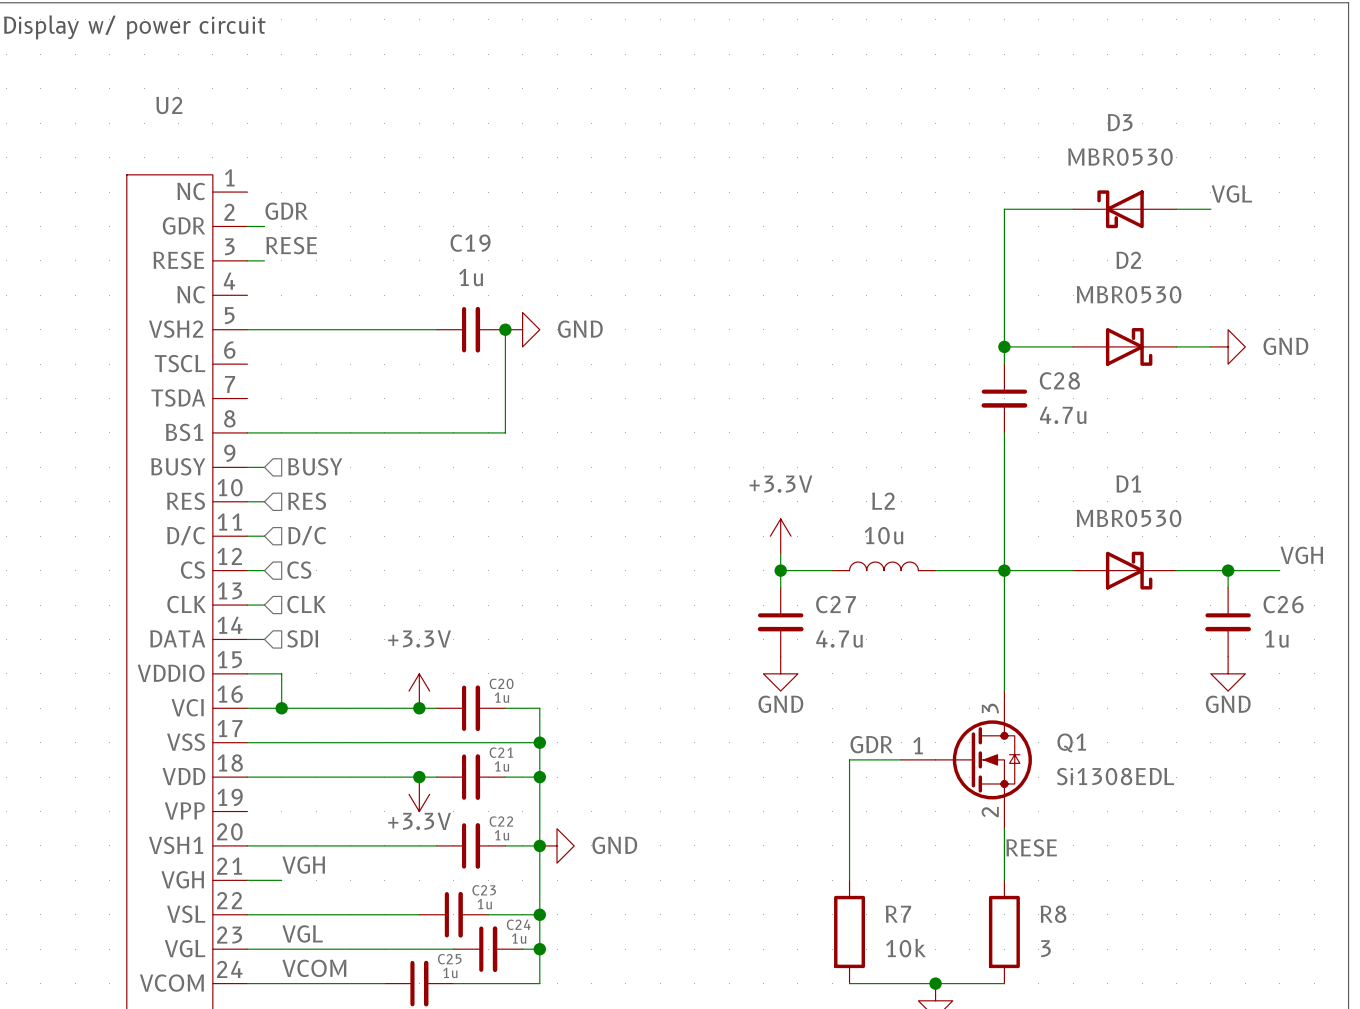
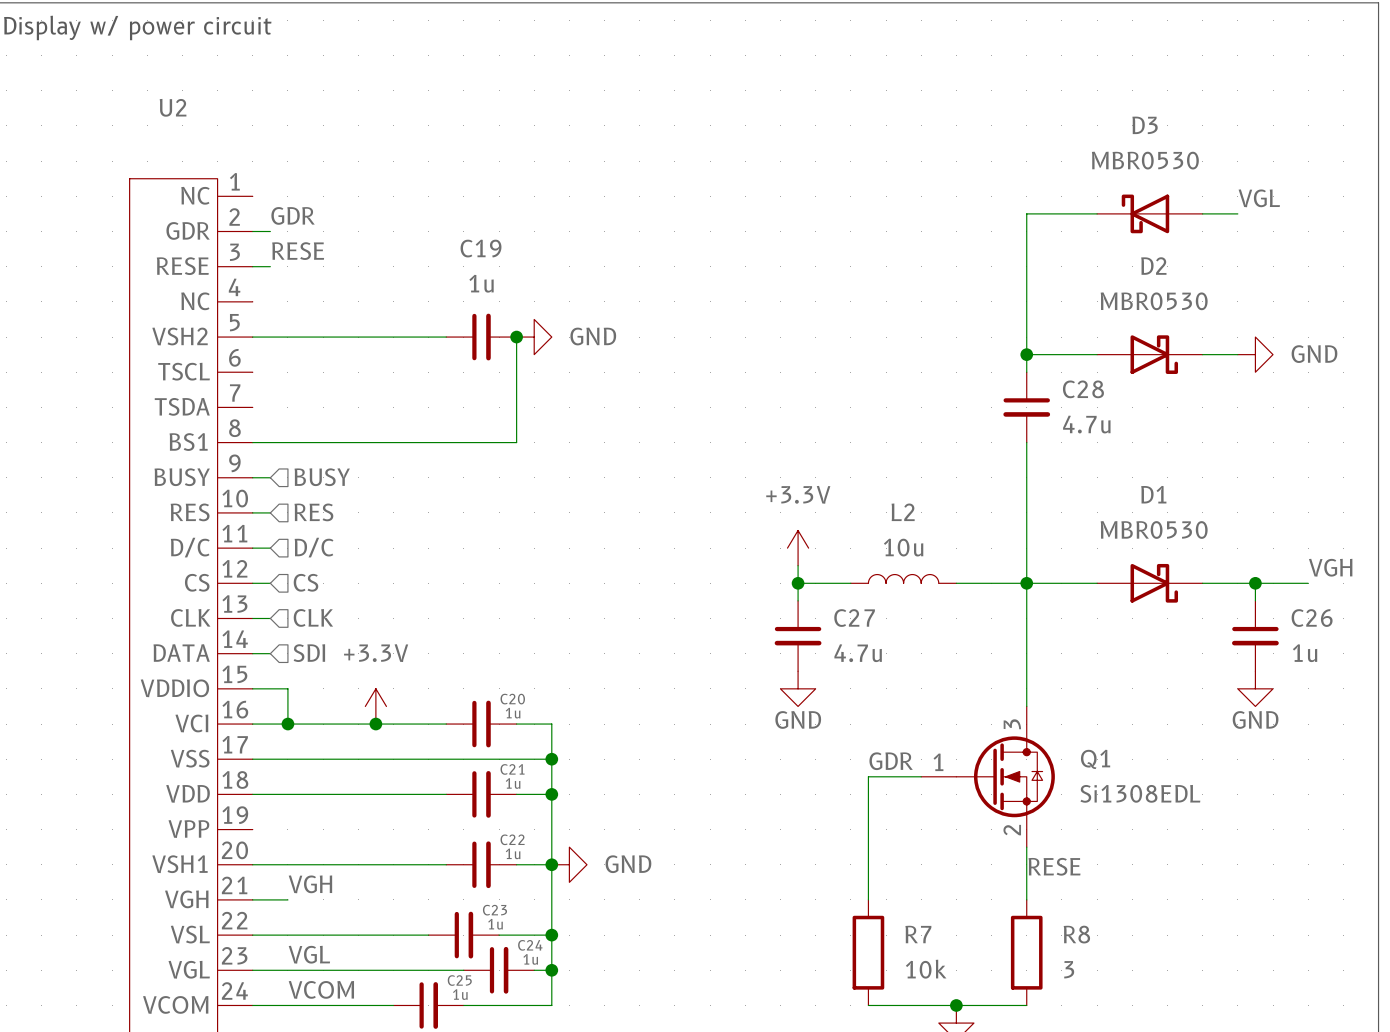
power symbol position: +3.3V (419, 691) -> +3.3V (375, 706)
junction: none -> (375, 724)
junction: (419, 708) -> none
junction: (419, 777) -> none
power symbol: +3.3V (419, 794) -> none

